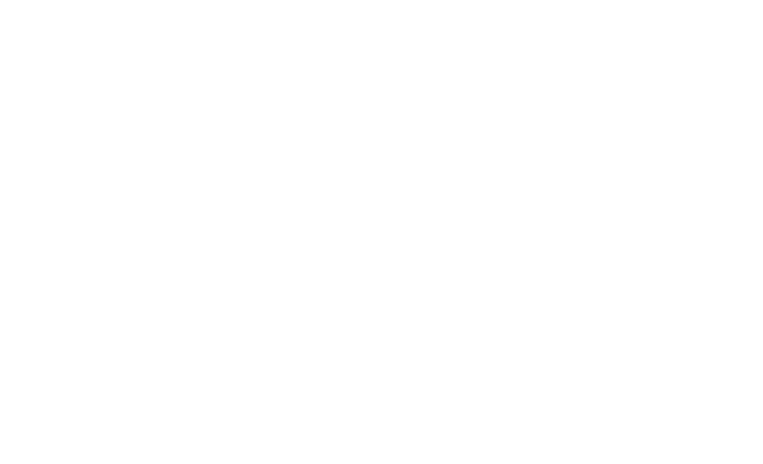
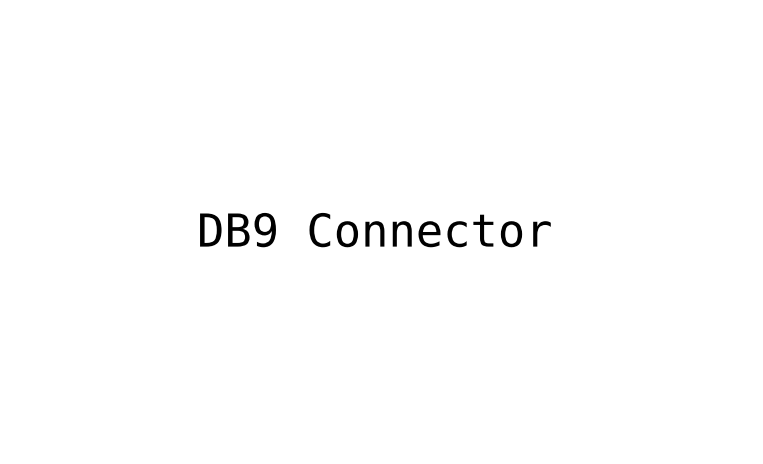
text: none -> DB9 Connector (375, 230)

